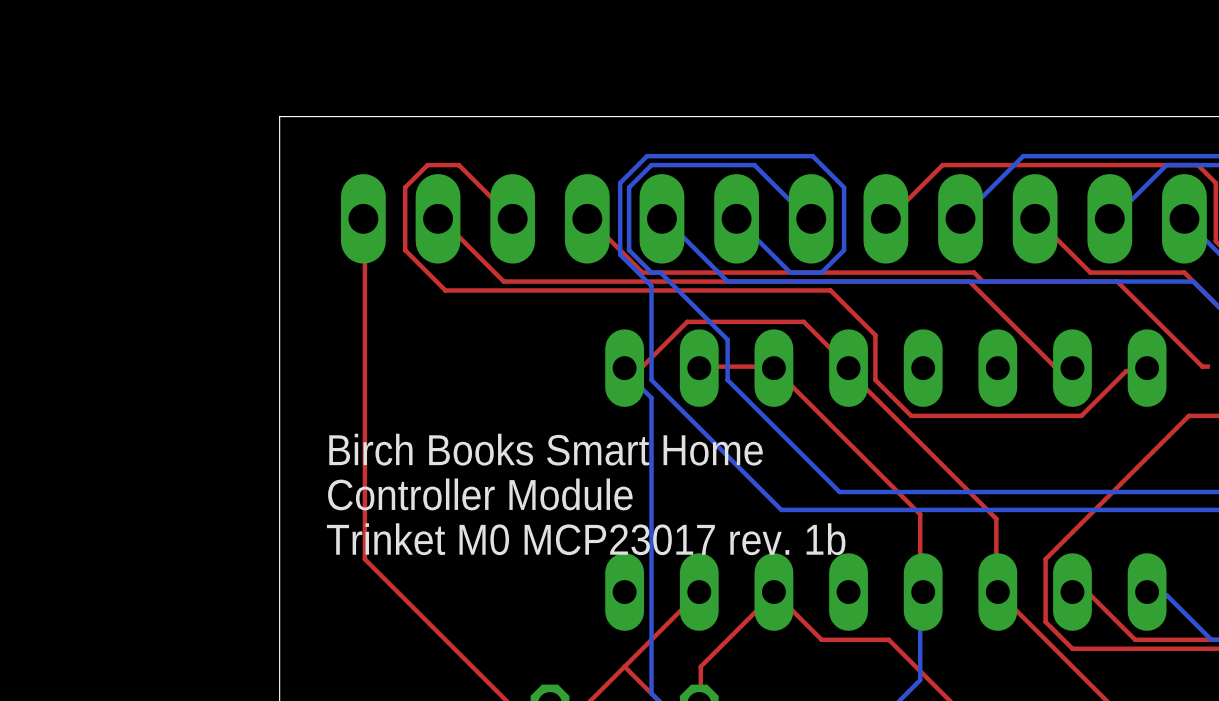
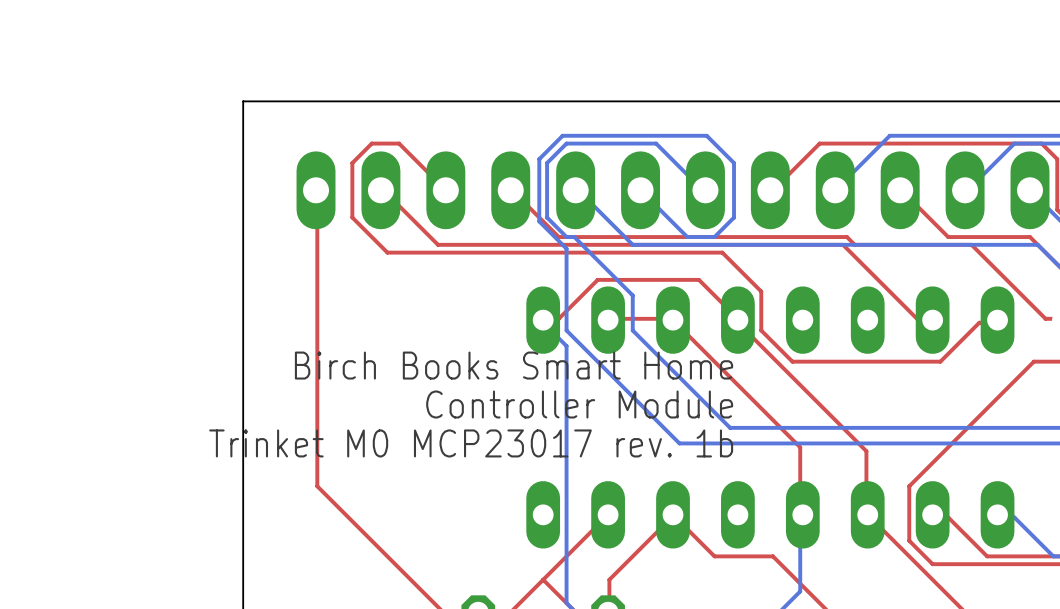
text position: Birch Books Smart Home (546, 449) -> Birch Books Smart Home (514, 365)
text position: Controller Module (480, 494) -> Controller Module (579, 404)
text position: Trinket M0 MCP23017 rev. 1b (586, 539) -> Trinket M0 MCP23017 rev. 1b (471, 443)

